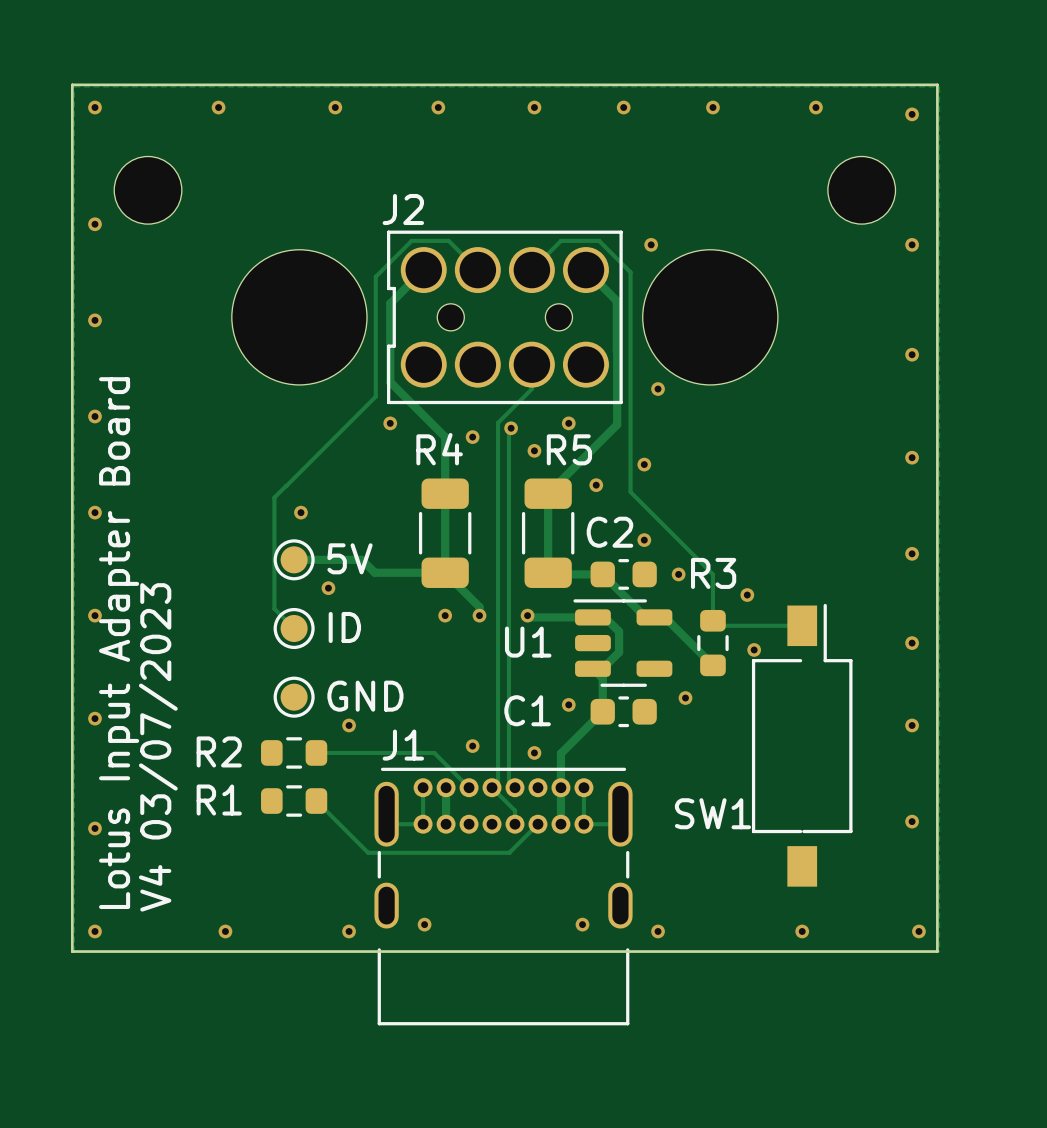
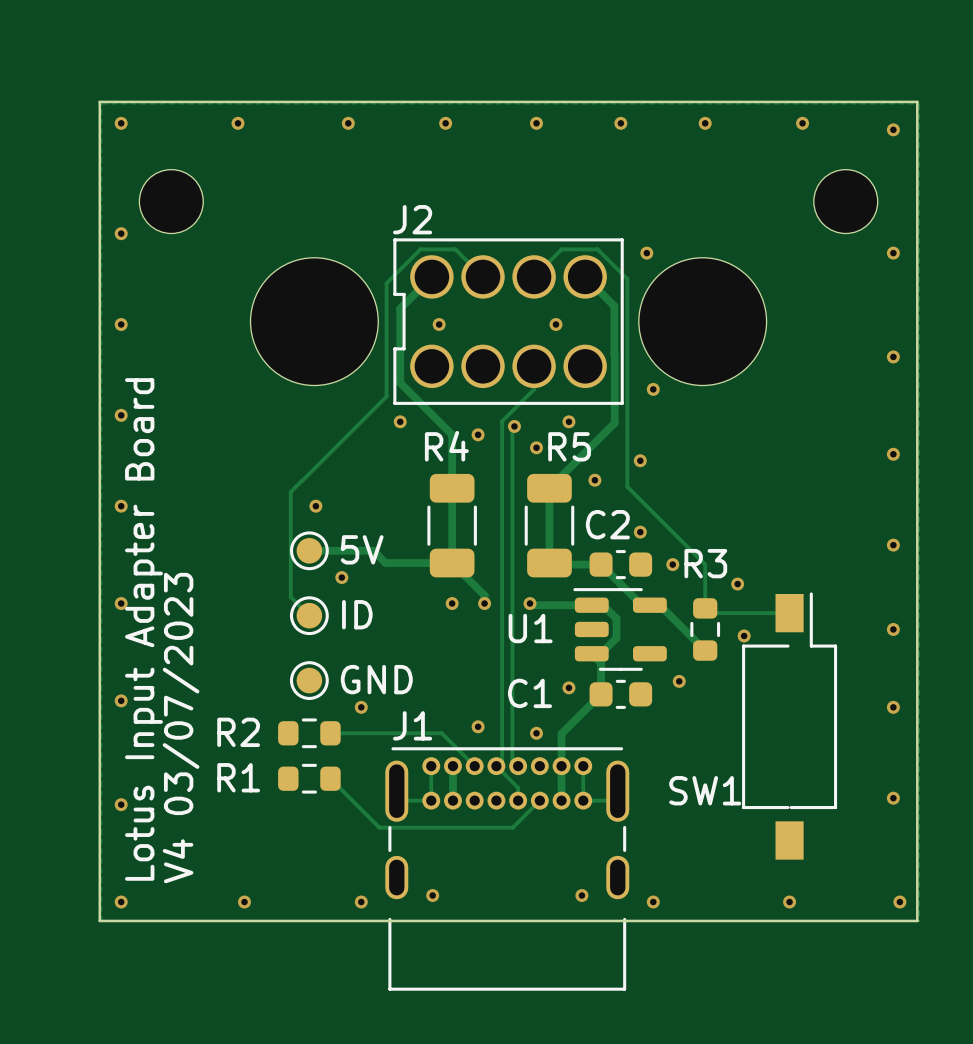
J2 footprint: [387, 230, 623, 405] -> [393, 238, 624, 405]
via: none -> (439, 324)
via: none -> (555, 324)

